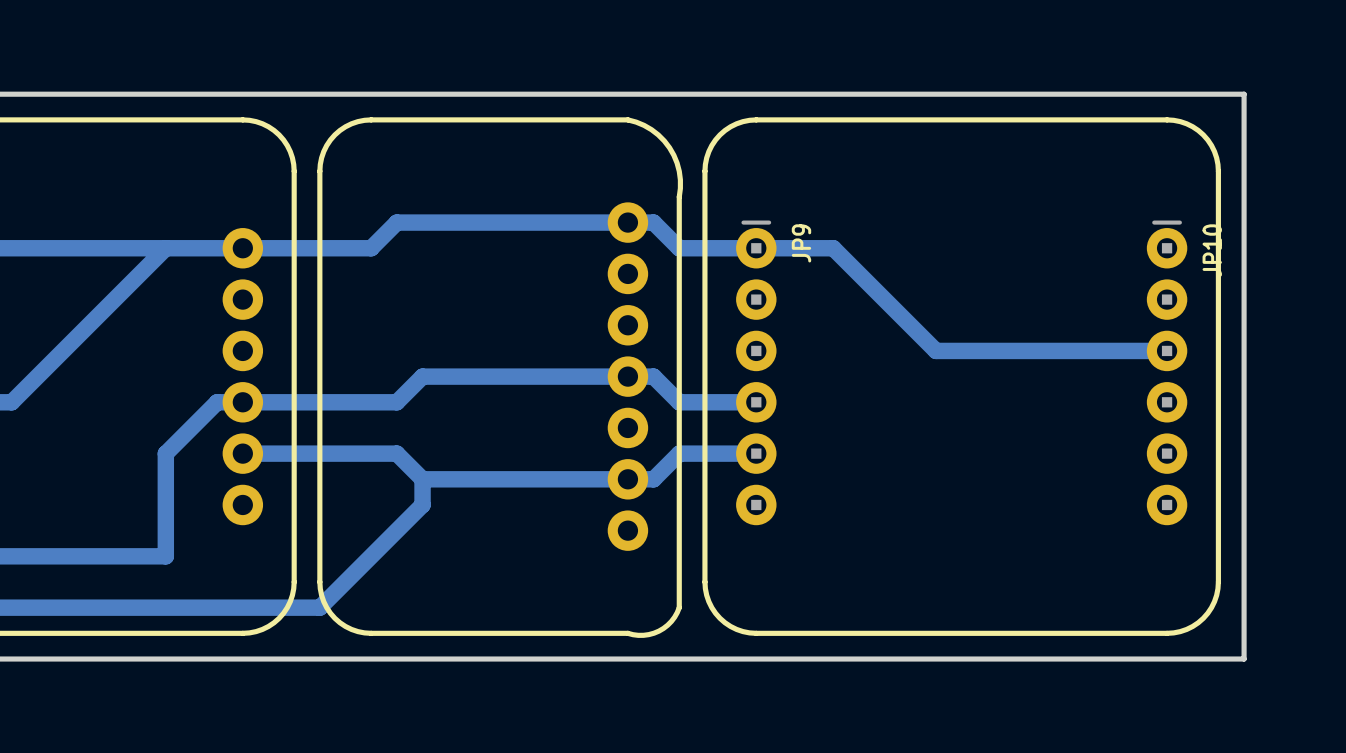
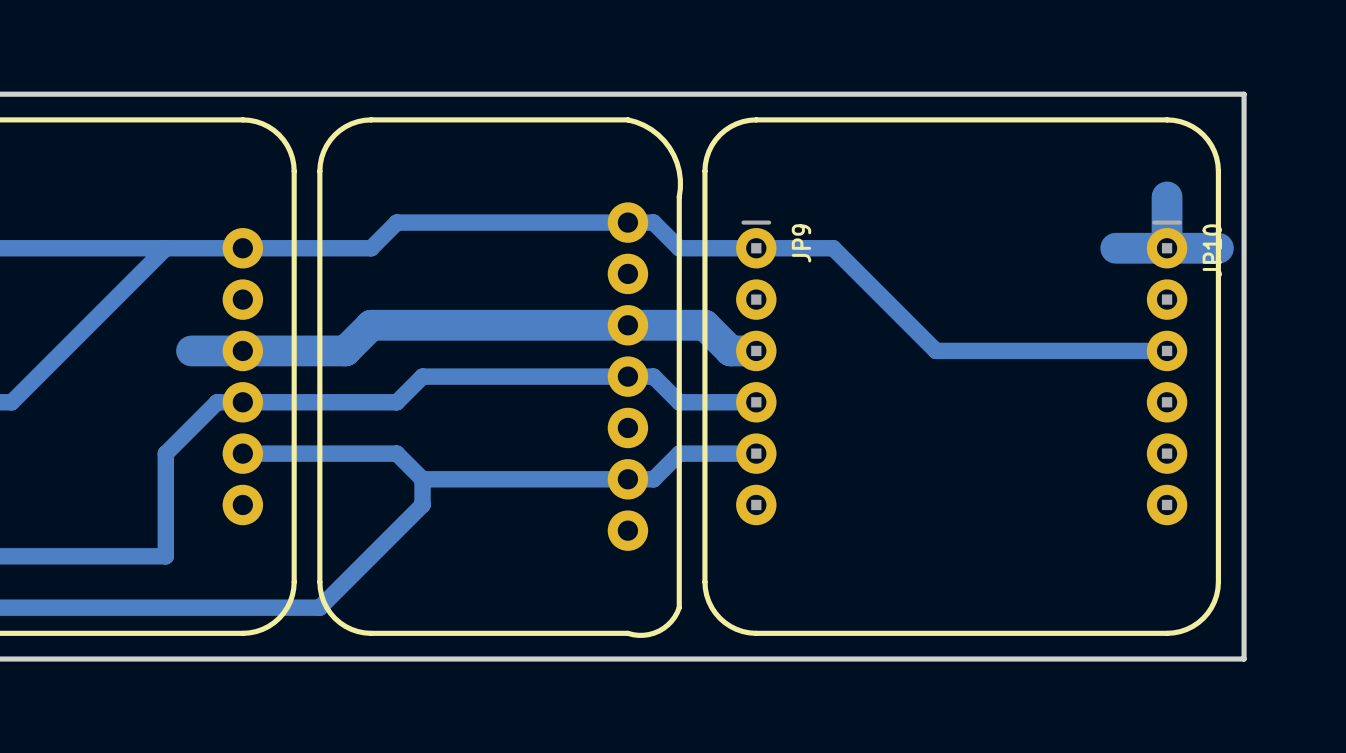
bottom track: none -> (1167, 196) (1167, 248)
bottom track: none -> (1115, 248) (1218, 248)
bottom track: none -> (191, 350) (345, 350) (371, 325) (704, 325) (730, 350) (756, 350)

